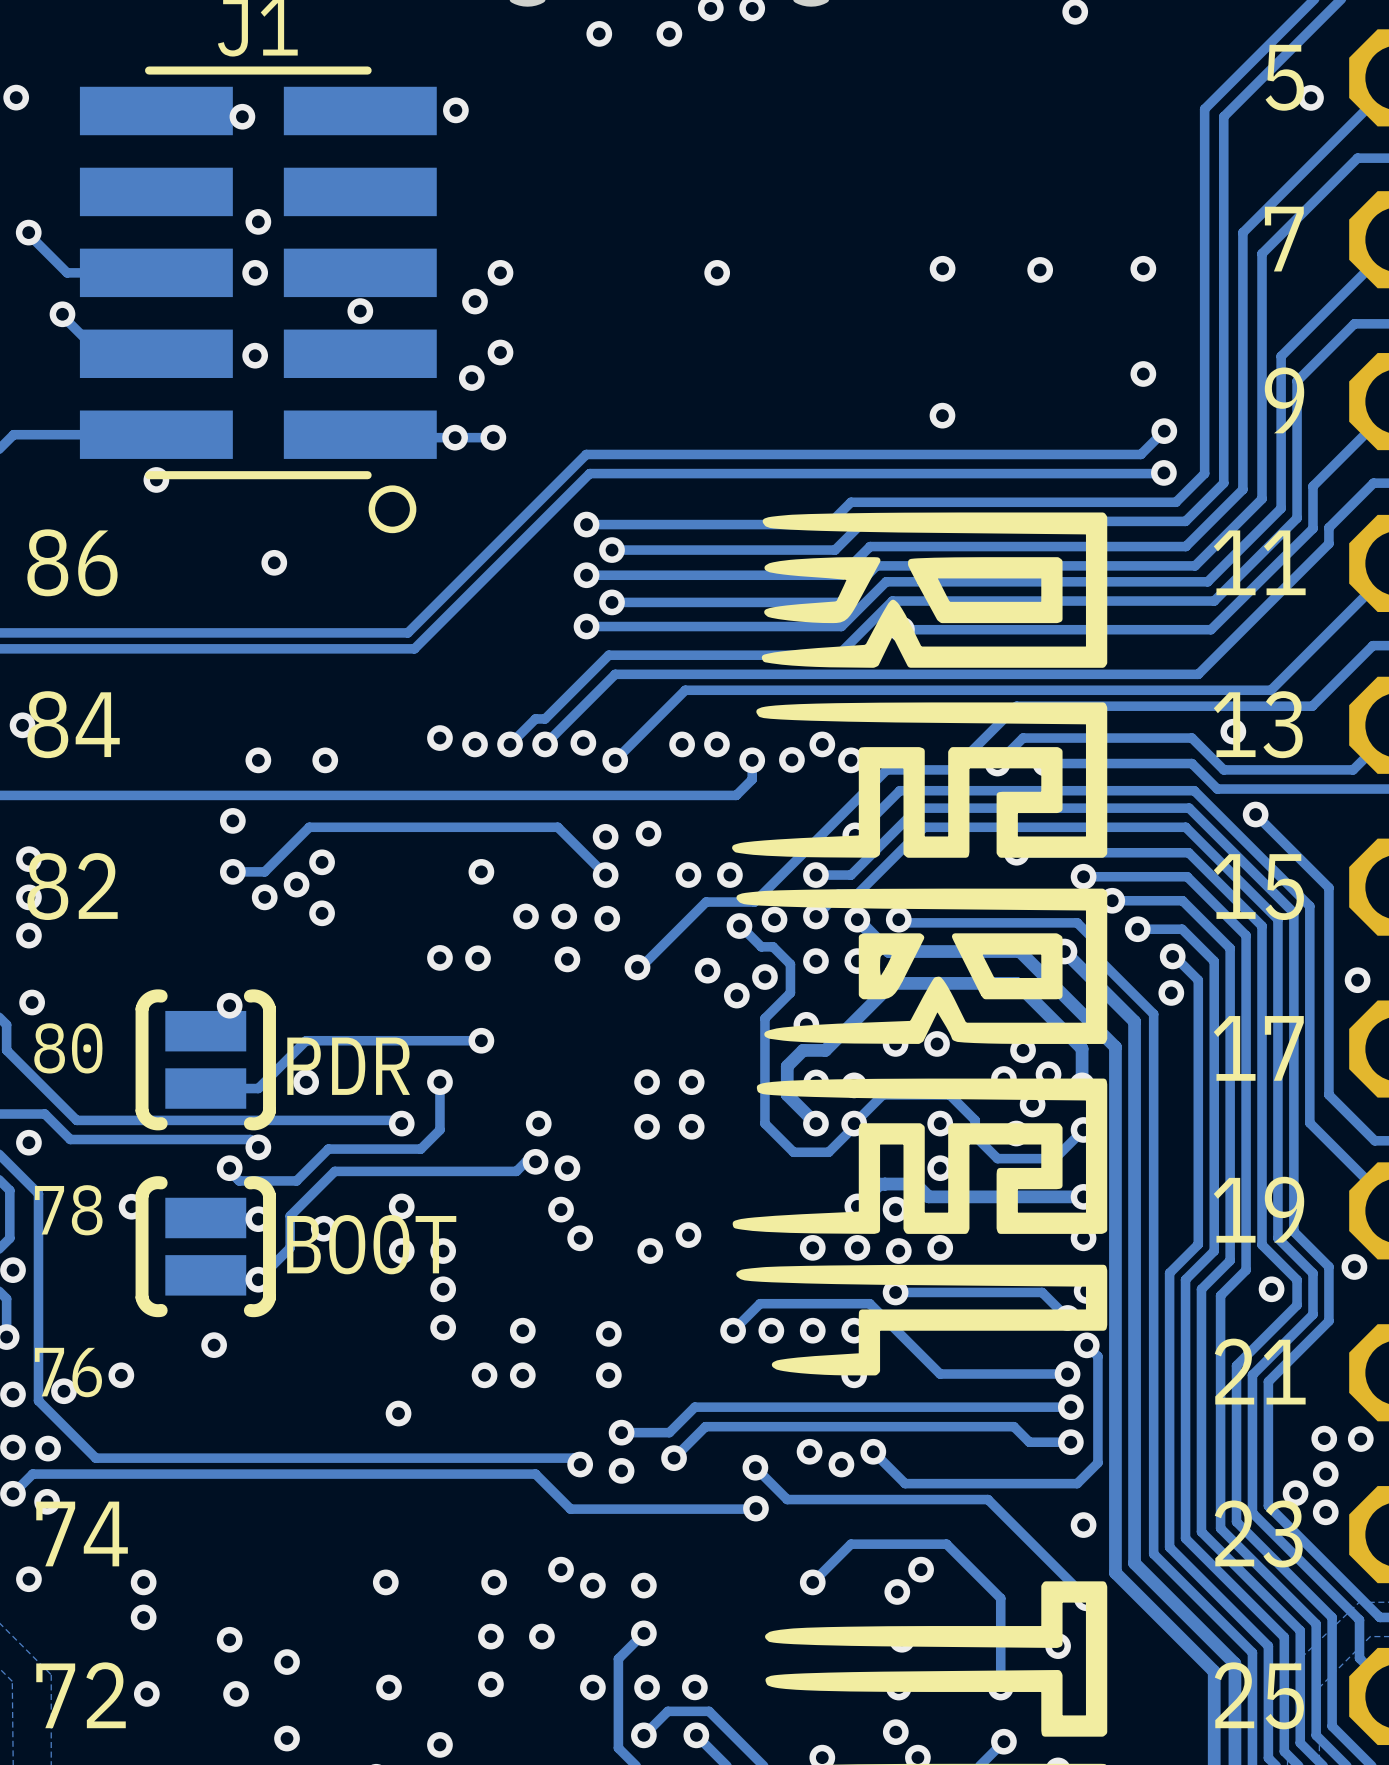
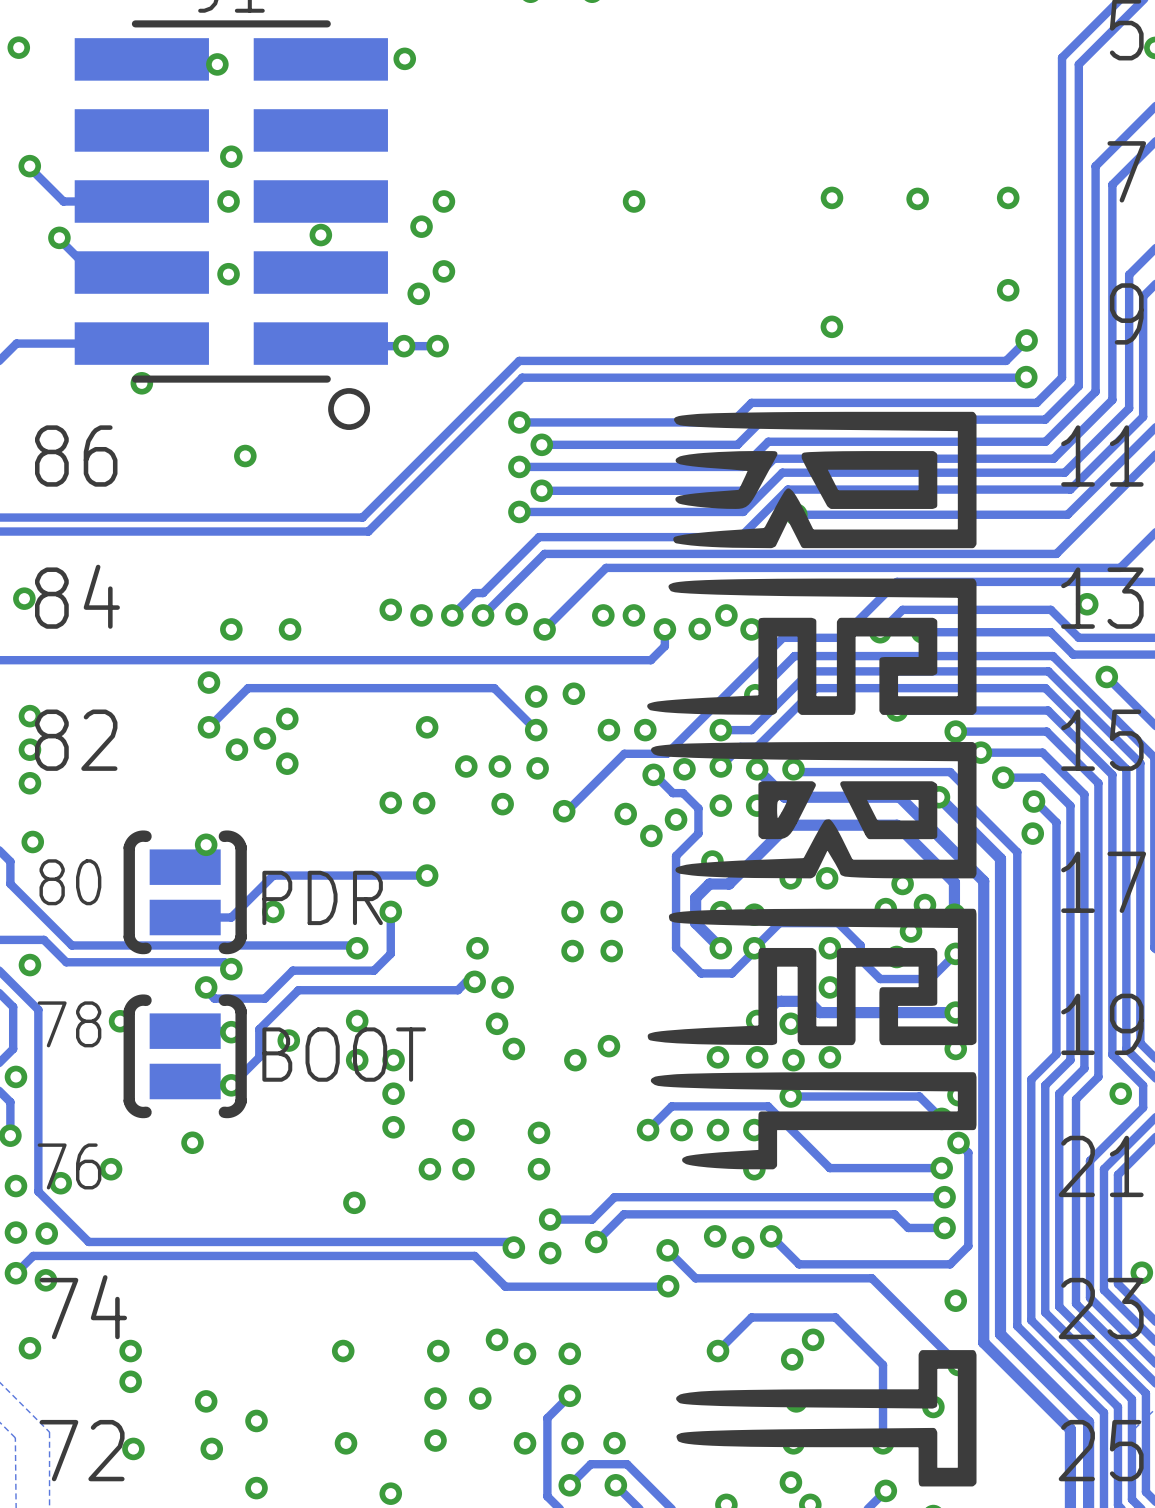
track: (309, 827) (264, 871) (232, 871) -> (276, 688) (248, 688) (208, 727)

